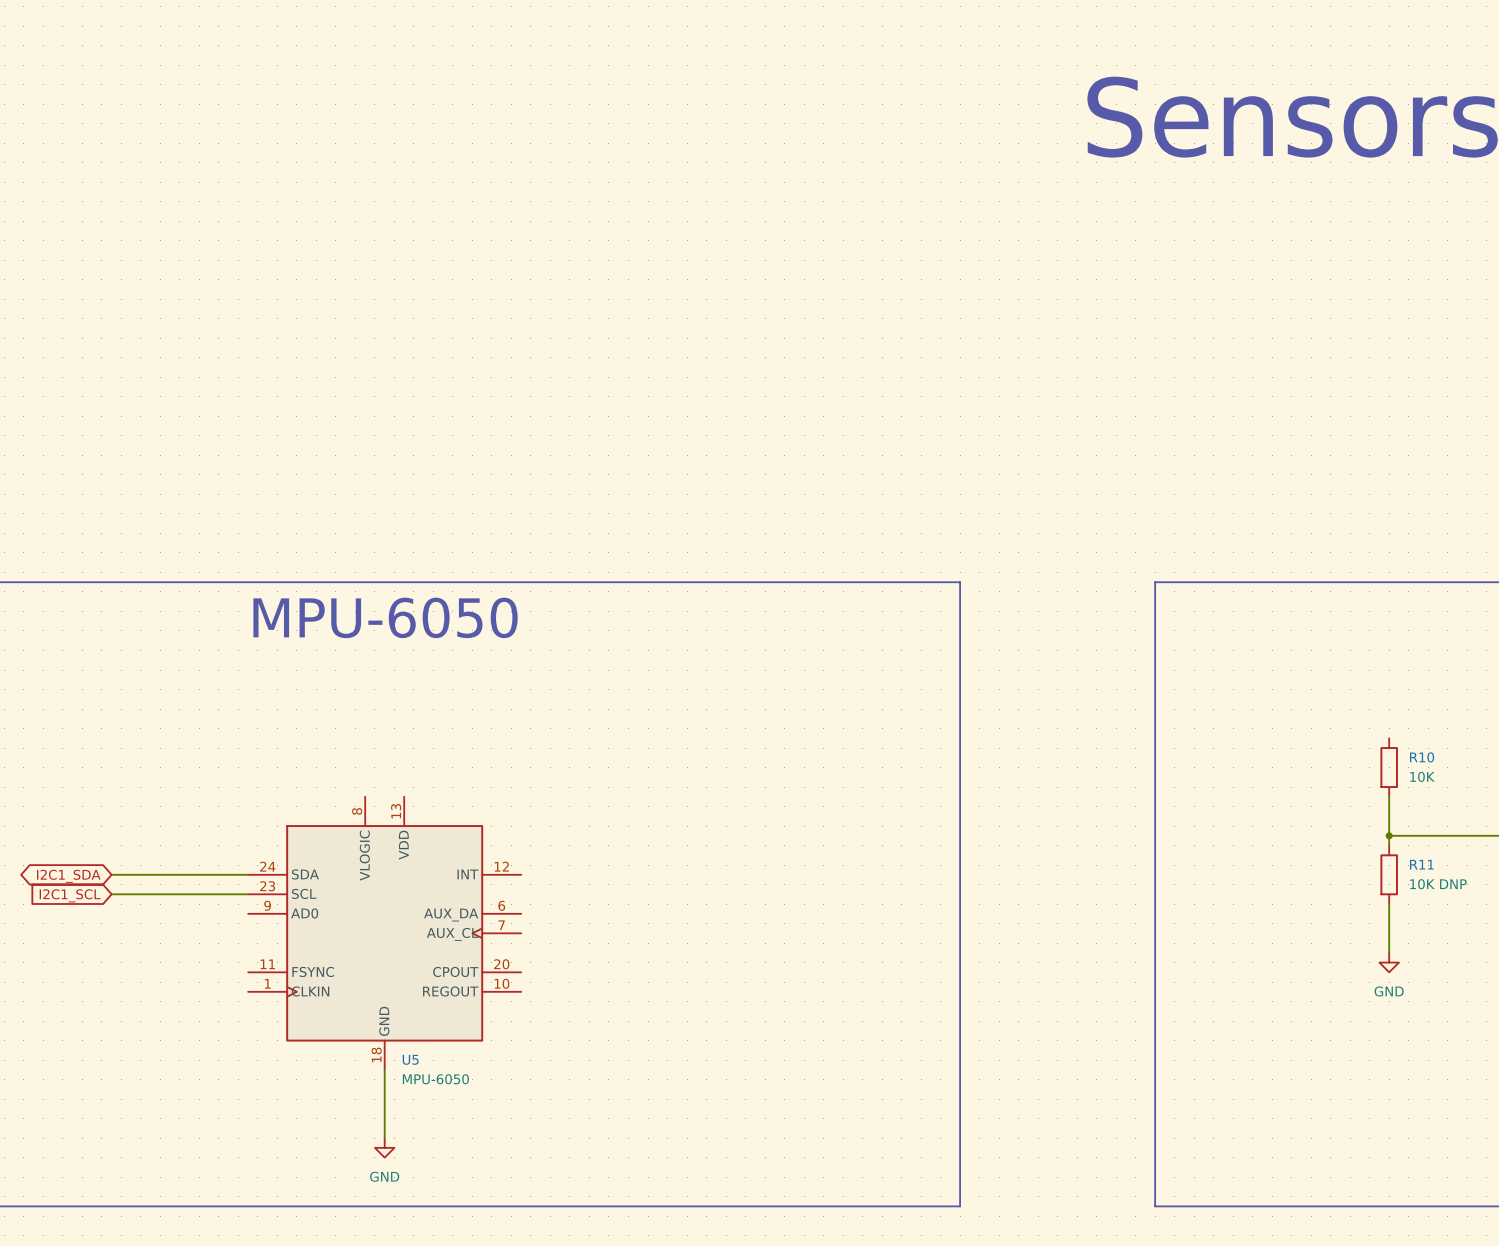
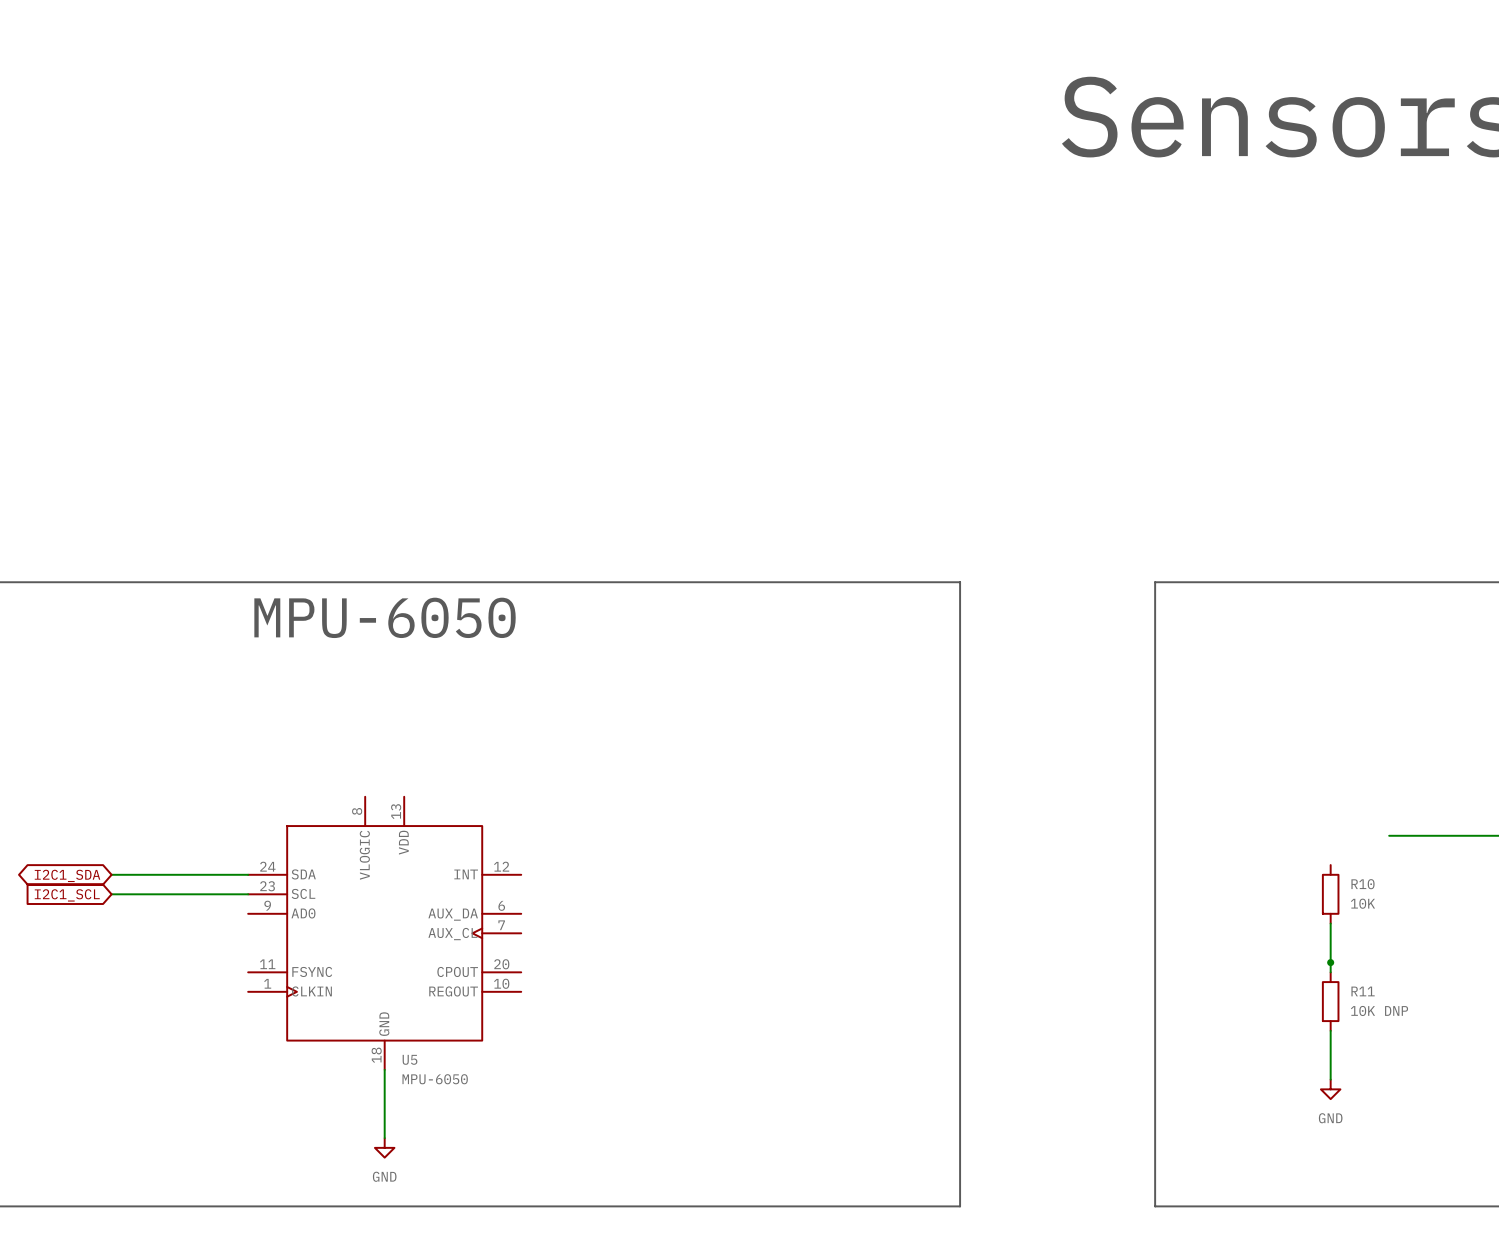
R10 position: (1389, 767) -> (1330, 894)
wire: (1389, 796) (1389, 845) -> (1330, 923) (1330, 972)
junction: (1389, 835) -> none
R11 position: (1389, 874) -> (1330, 1001)
wire: (1389, 904) (1389, 952) -> (1330, 1030) (1330, 1079)
junction: none -> (1330, 962)
power symbol position: GND (1389, 962) -> GND (1330, 1089)

